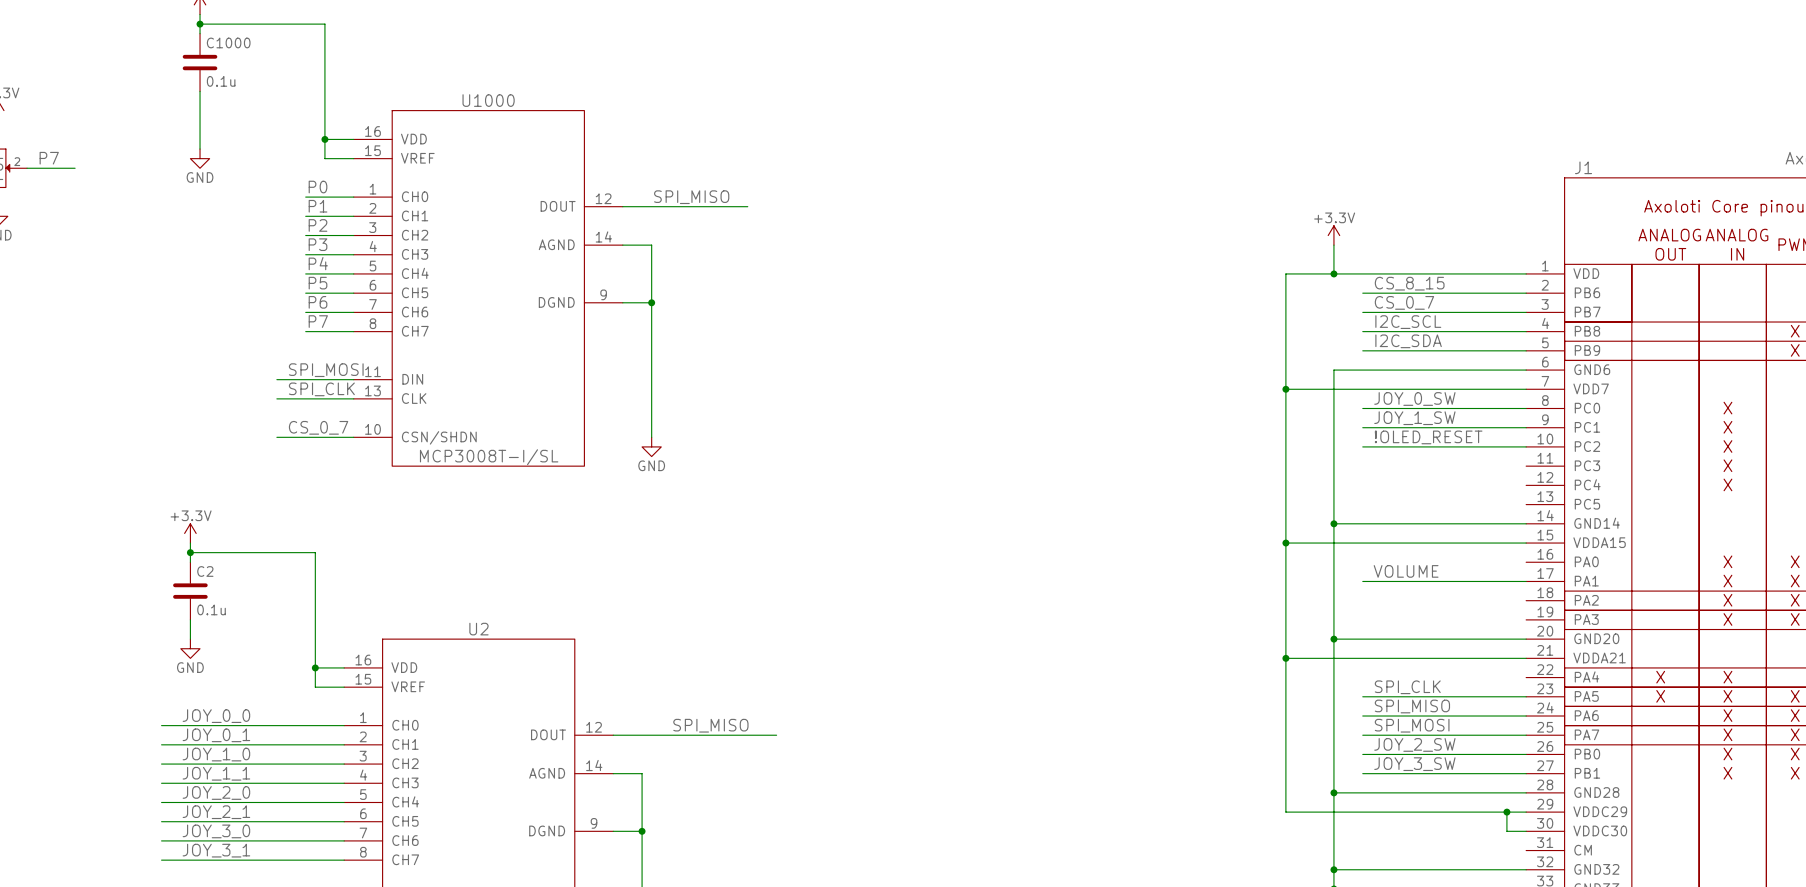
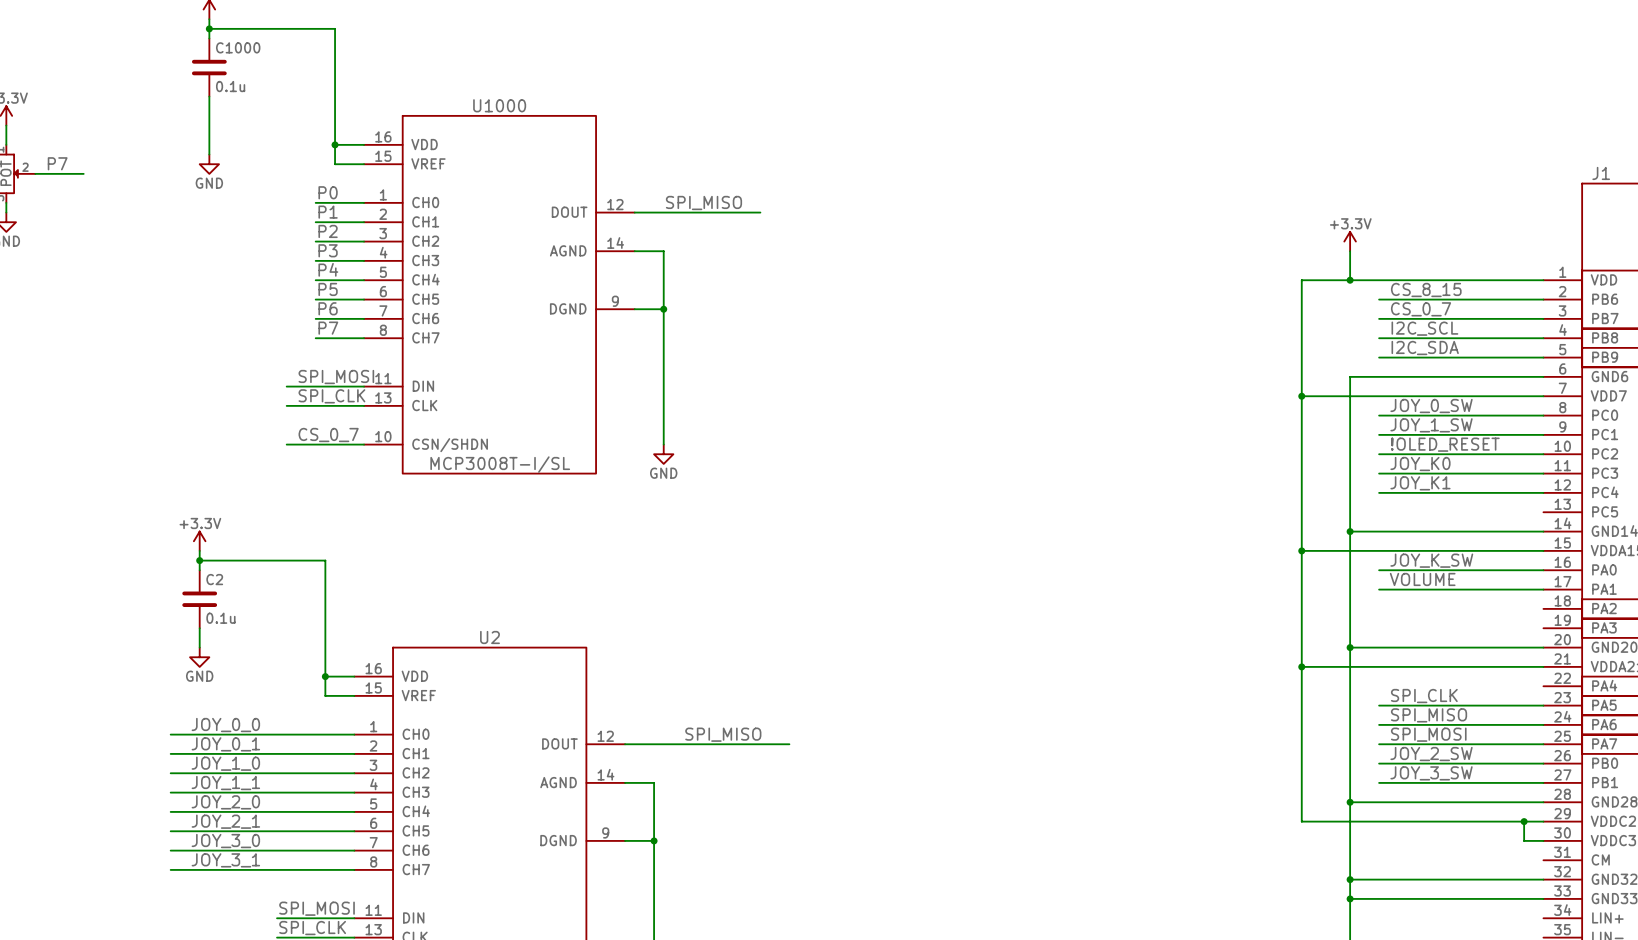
label: none -> JOY_K0 (1420, 464)
wire: none -> (1379, 473) (1543, 473)
label: none -> JOY_K1 (1420, 483)
wire: none -> (1379, 492) (1543, 492)
label: none -> JOY_K_SW (1431, 560)
wire: none -> (1379, 570) (1543, 570)

